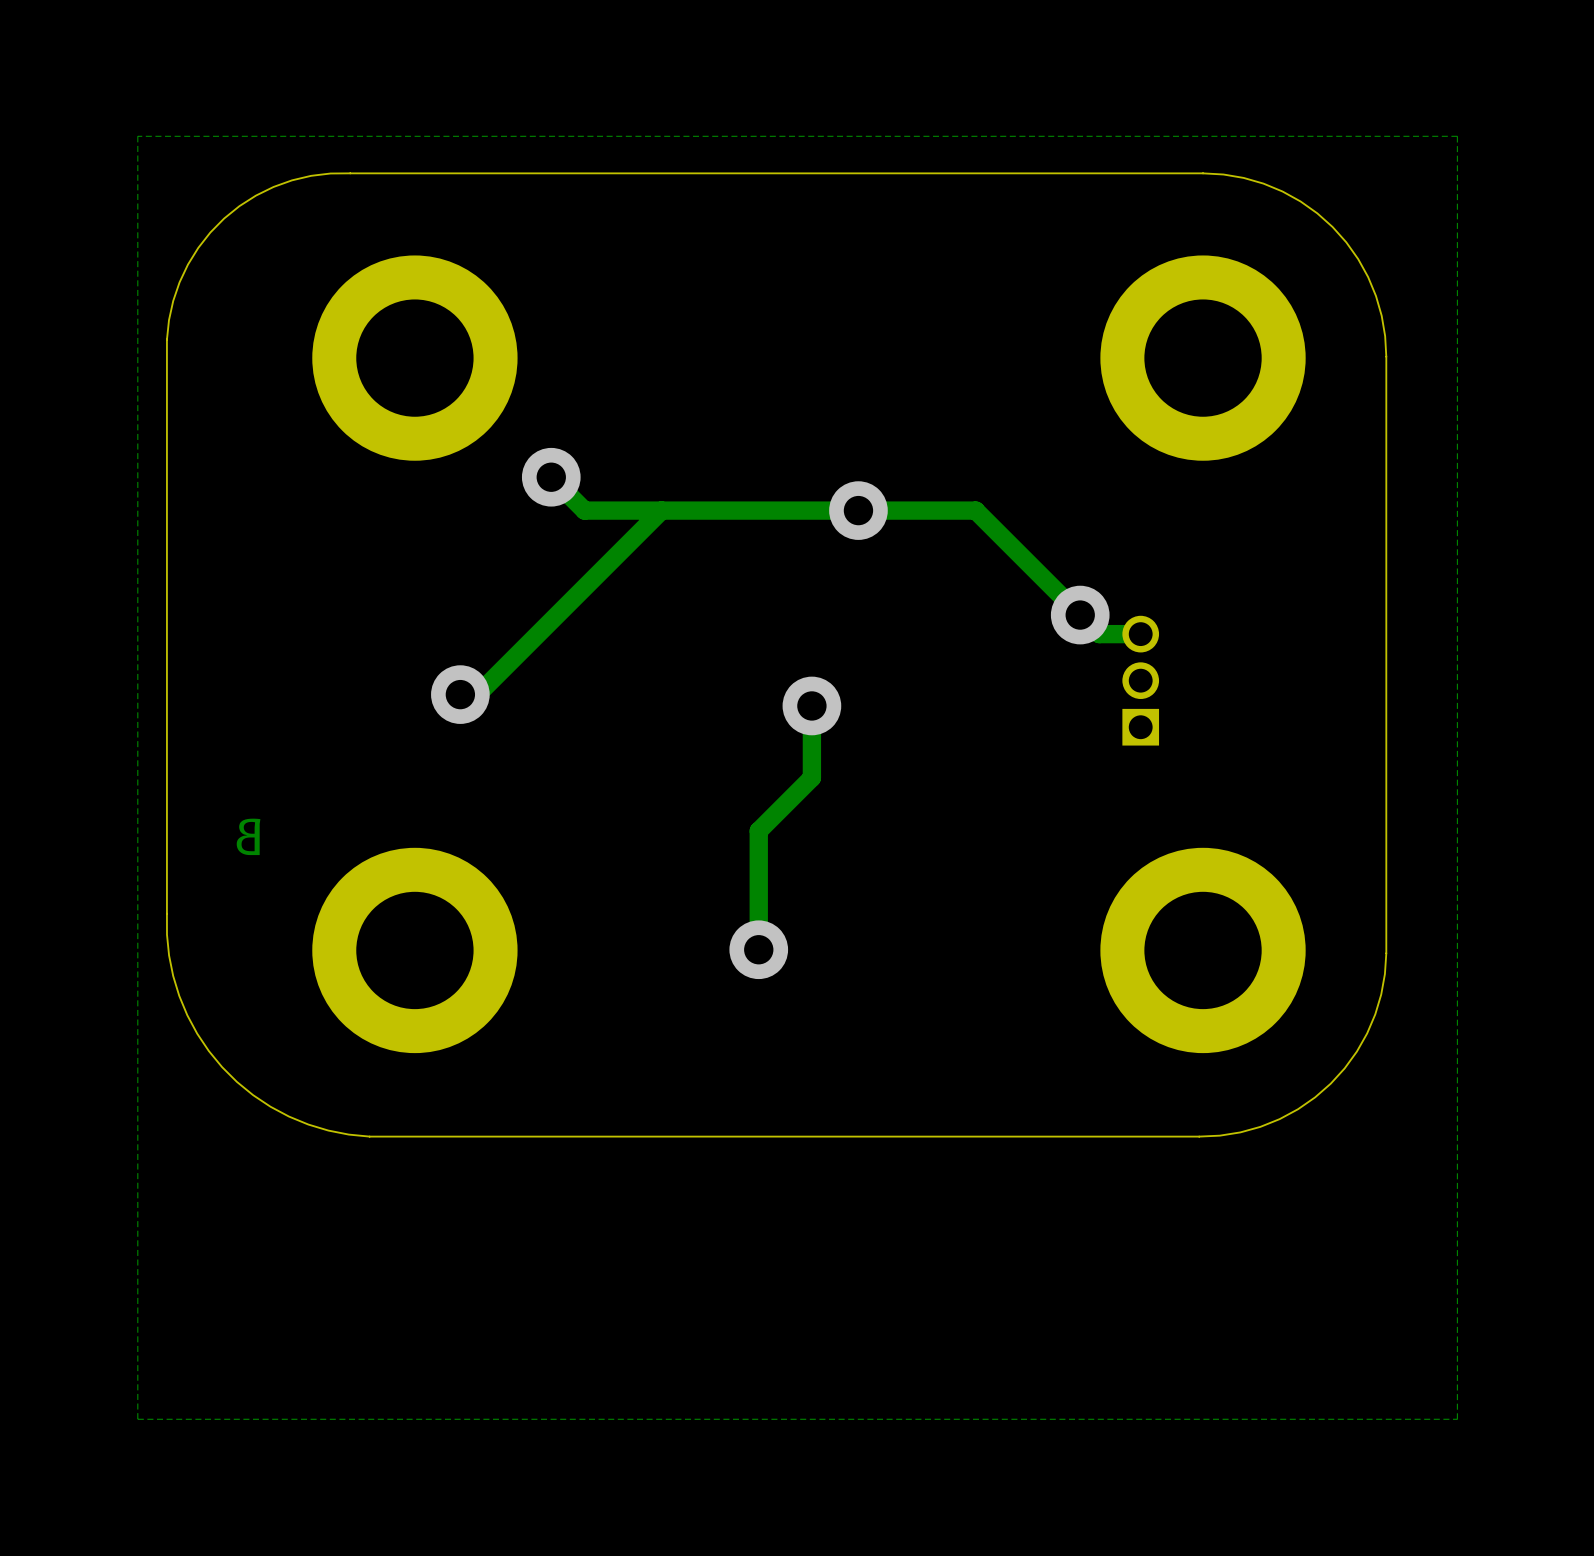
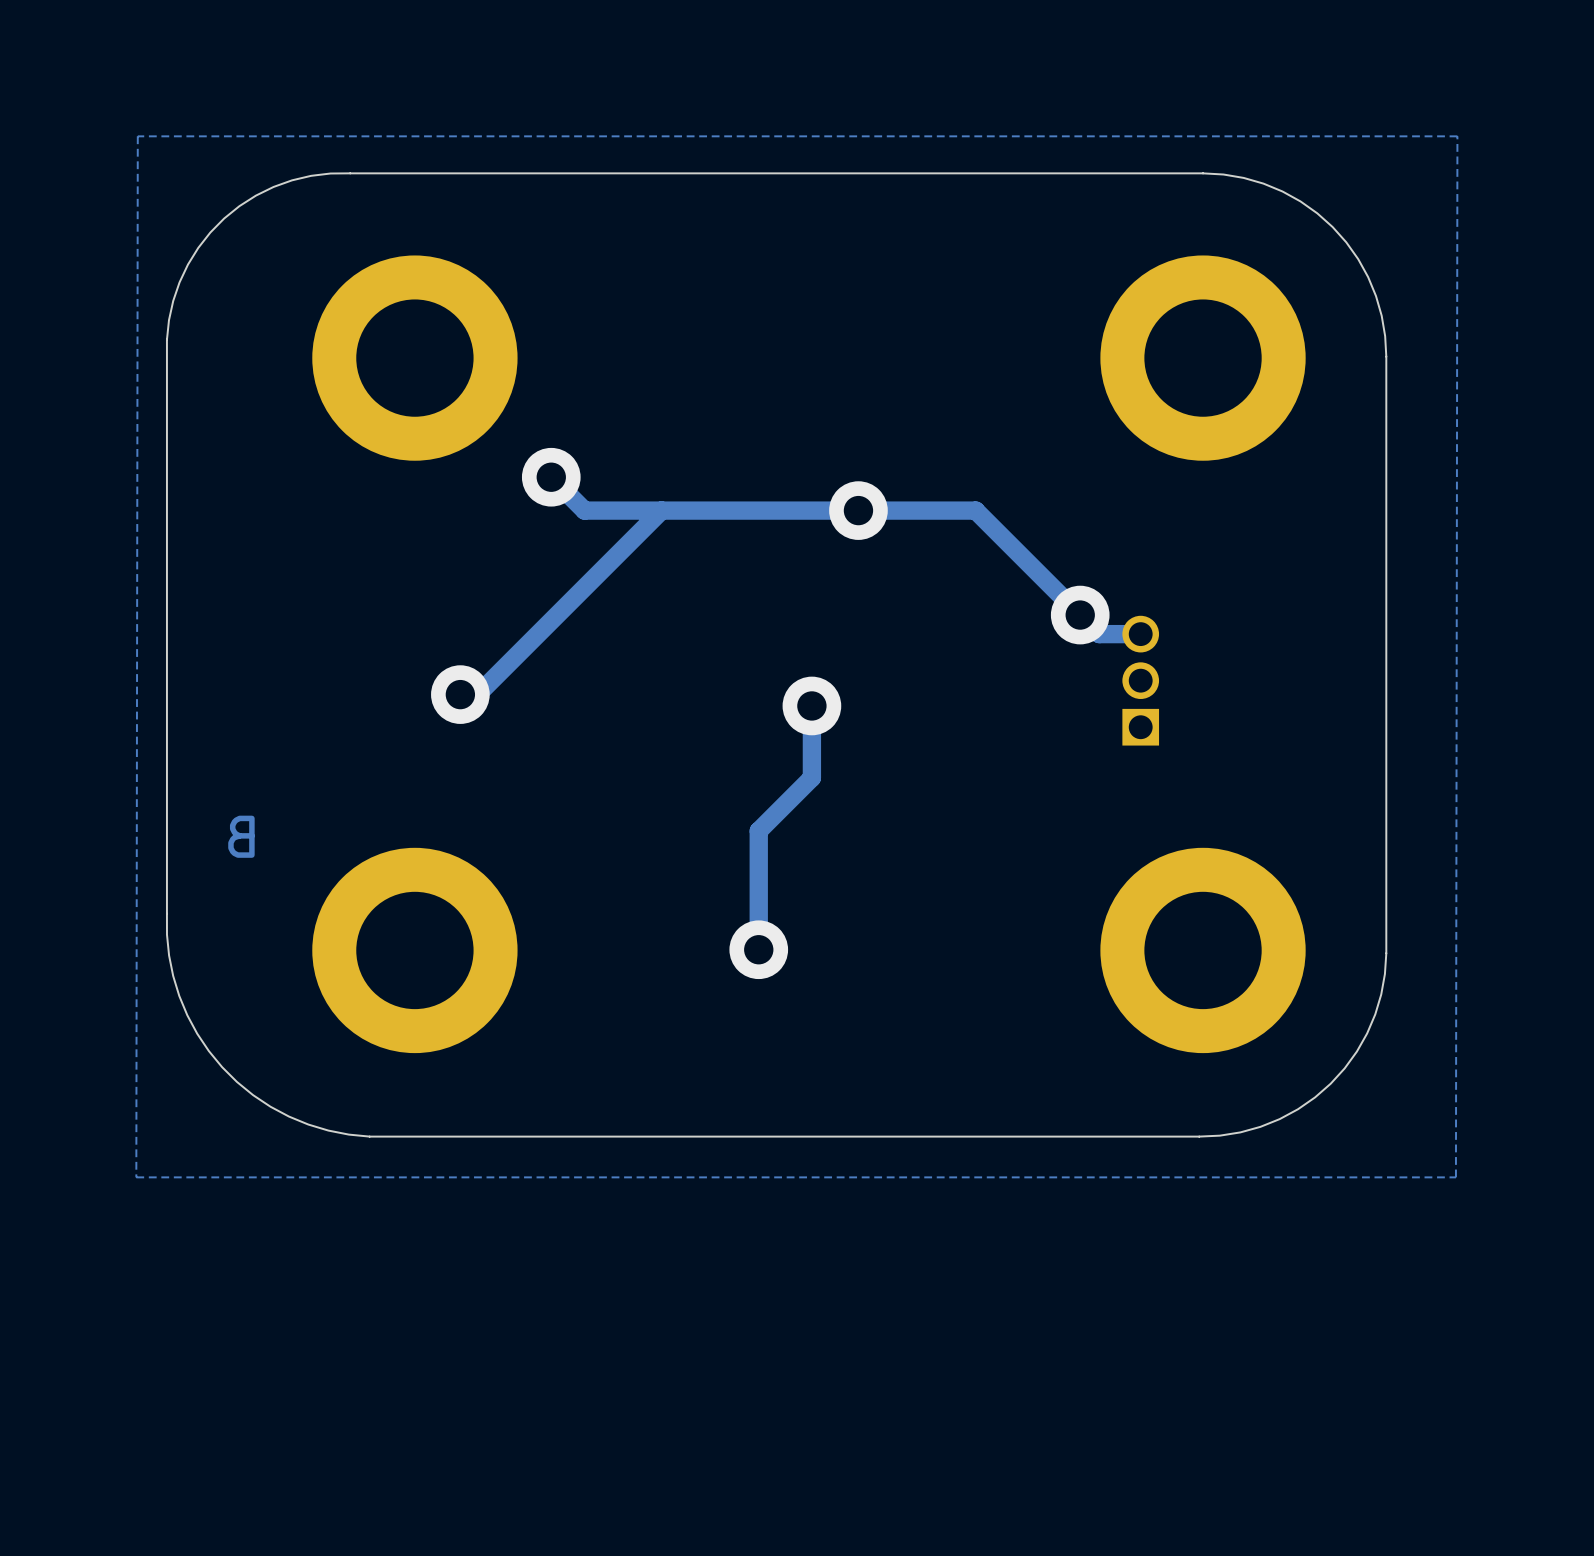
zone outline: (1457, 136) (1457, 1419) (137, 1419) (137, 136) -> (1457, 136) (1455, 1177) (136, 1177) (137, 136)

